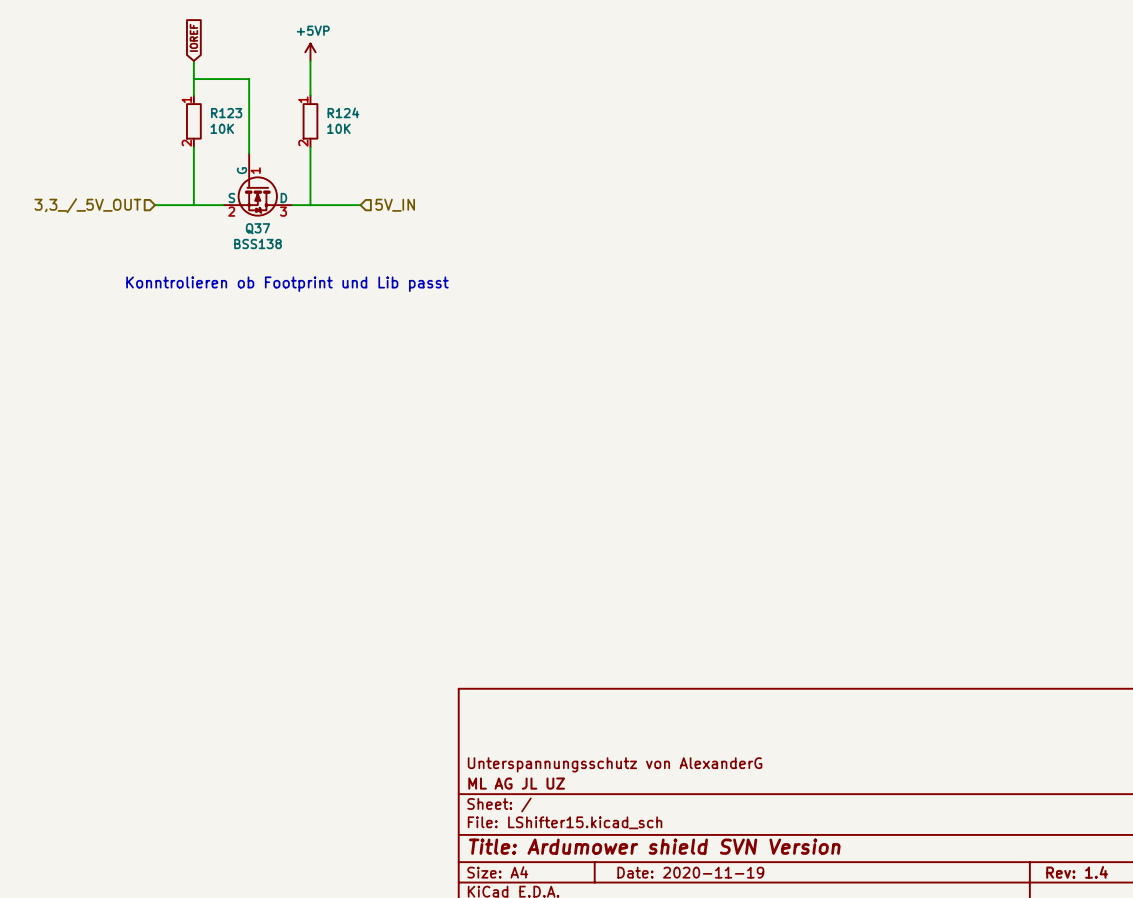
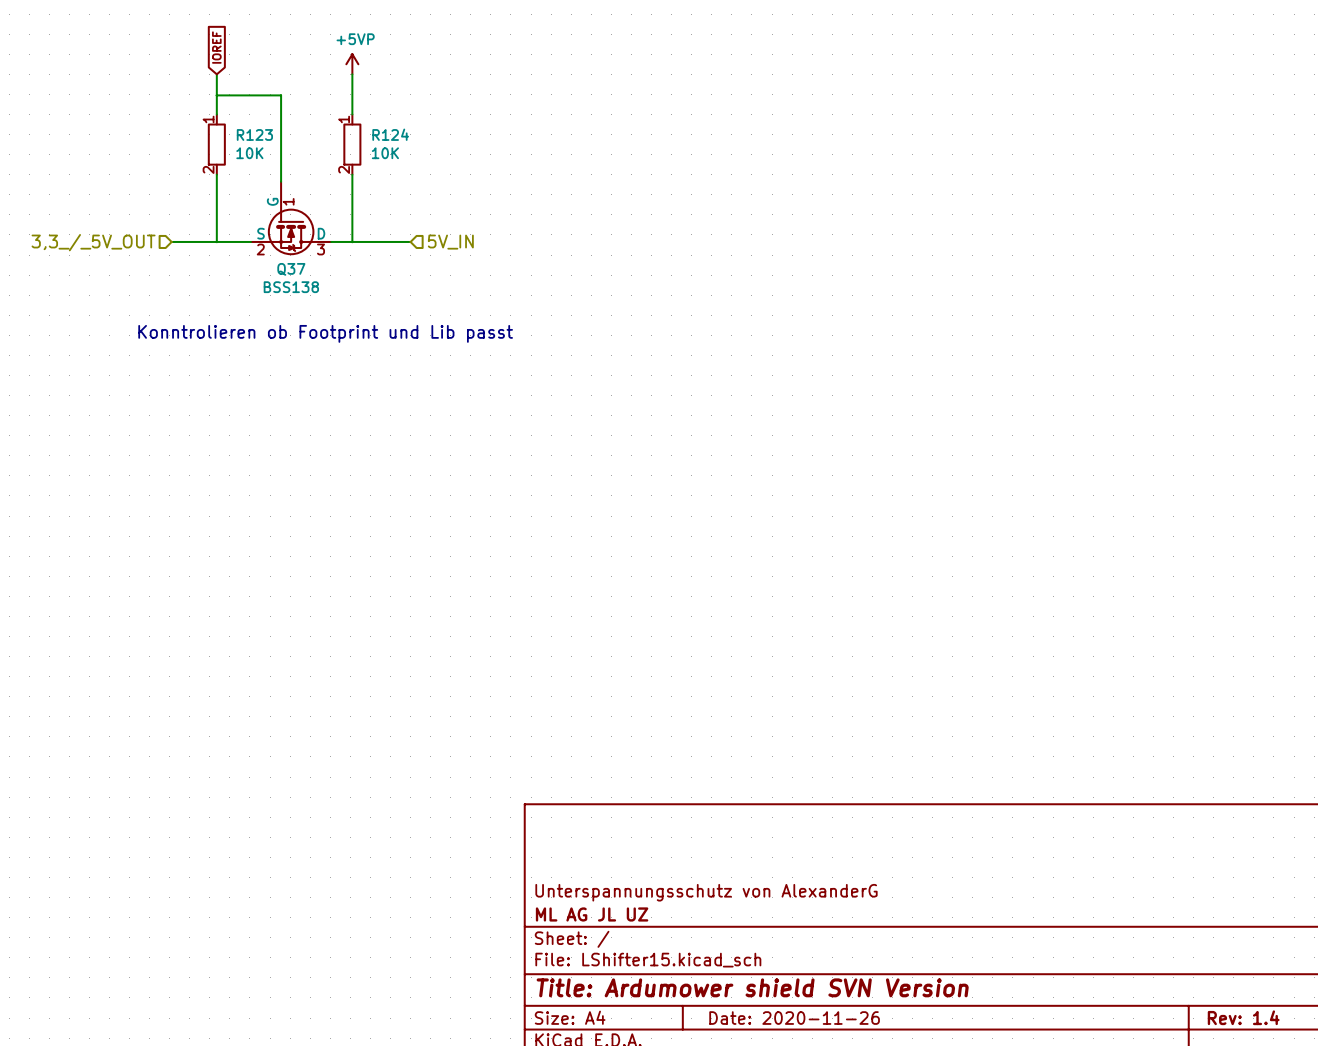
title block: Date: 2020-11-19 (690, 872) -> Date: 2020-11-26 (794, 1018)

